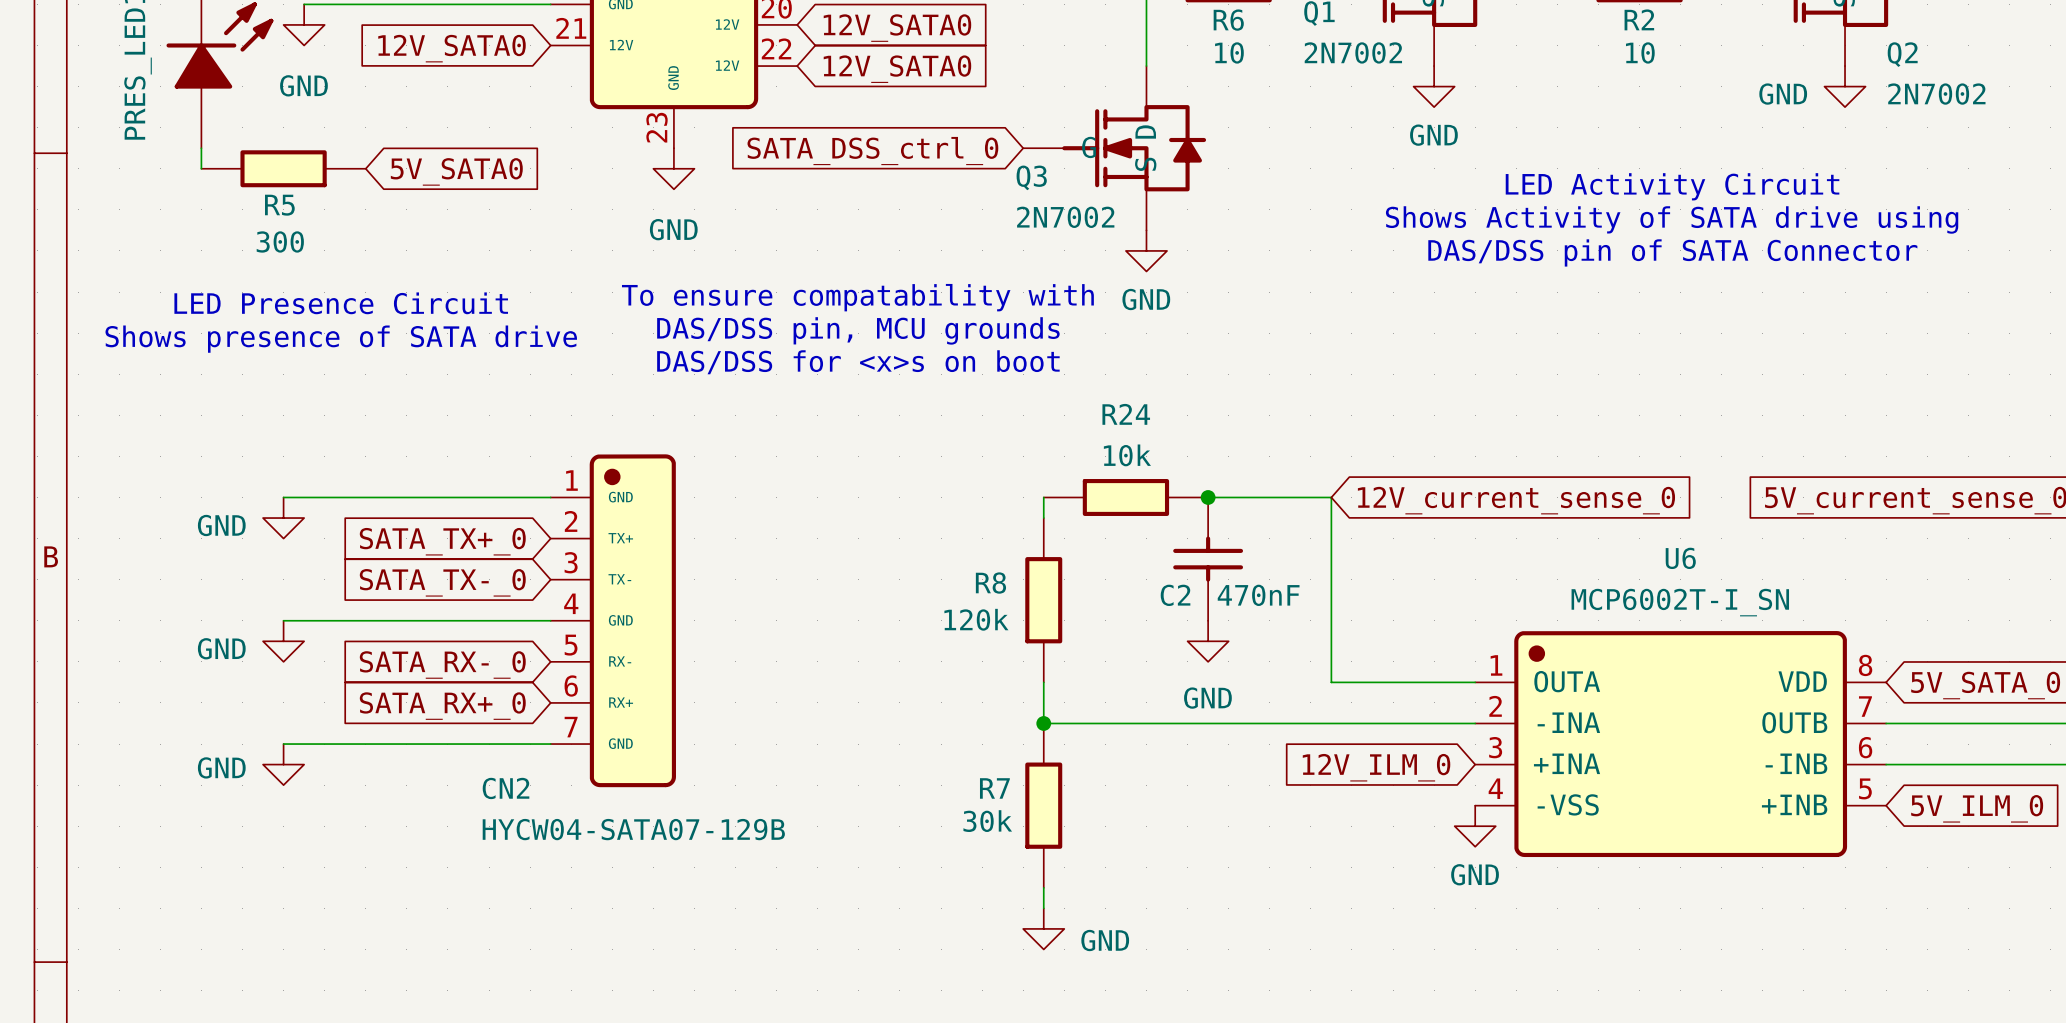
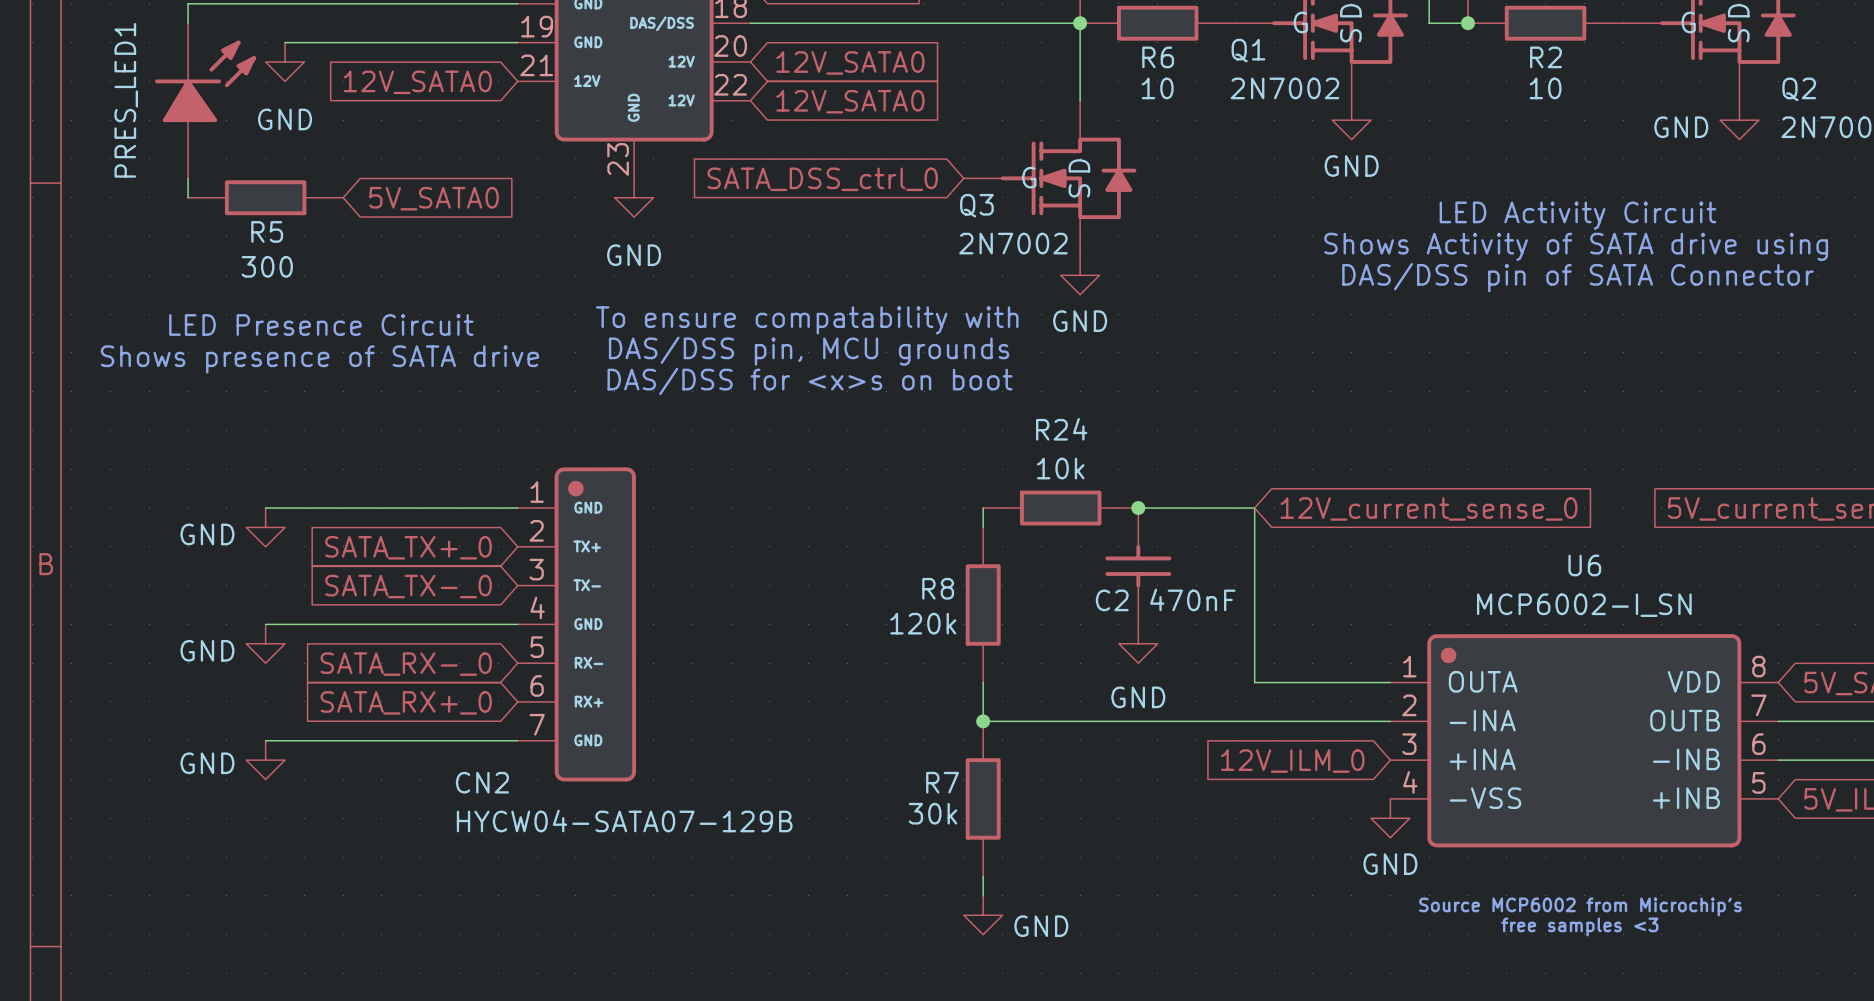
U6 value: MCP6002T-I_SN (1680, 602) -> MCP6002-I_SN (1584, 605)
text: none -> Source MCP6002 from Microchip's (1580, 906)
text: none -> free samples <3 (1579, 926)

